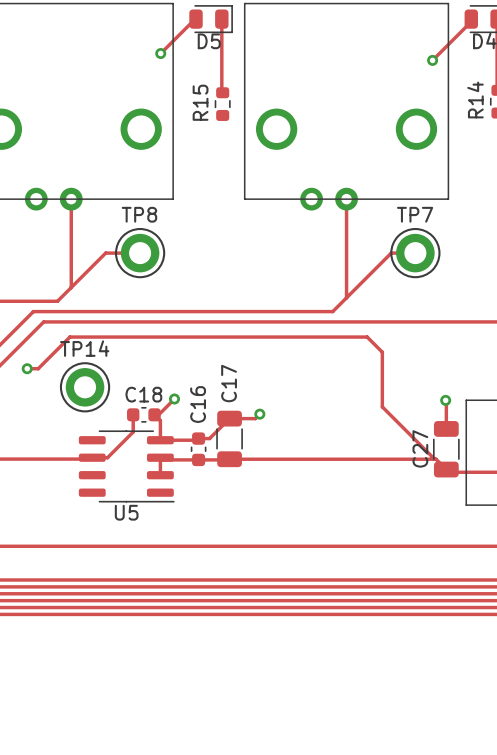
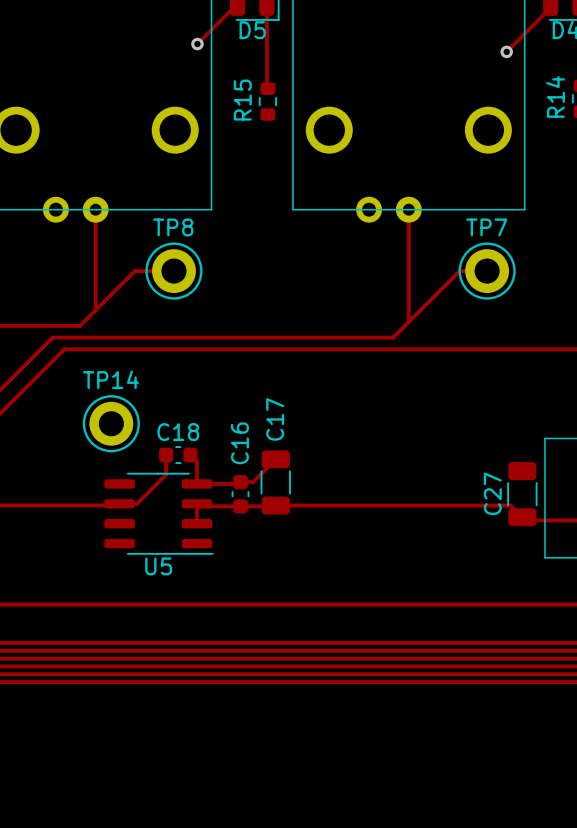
track: (27, 368) (38, 368) (69, 337) (367, 337) (382, 352) (382, 406) (434, 459) -> none
via: (27, 368) -> none
track: (174, 399) (158, 414) (154, 414) -> none
via: (174, 399) -> none
track: (445, 400) (446, 428) -> none
via: (445, 400) -> none
track: (259, 414) (255, 418) (229, 418) -> none
via: (259, 414) -> none

